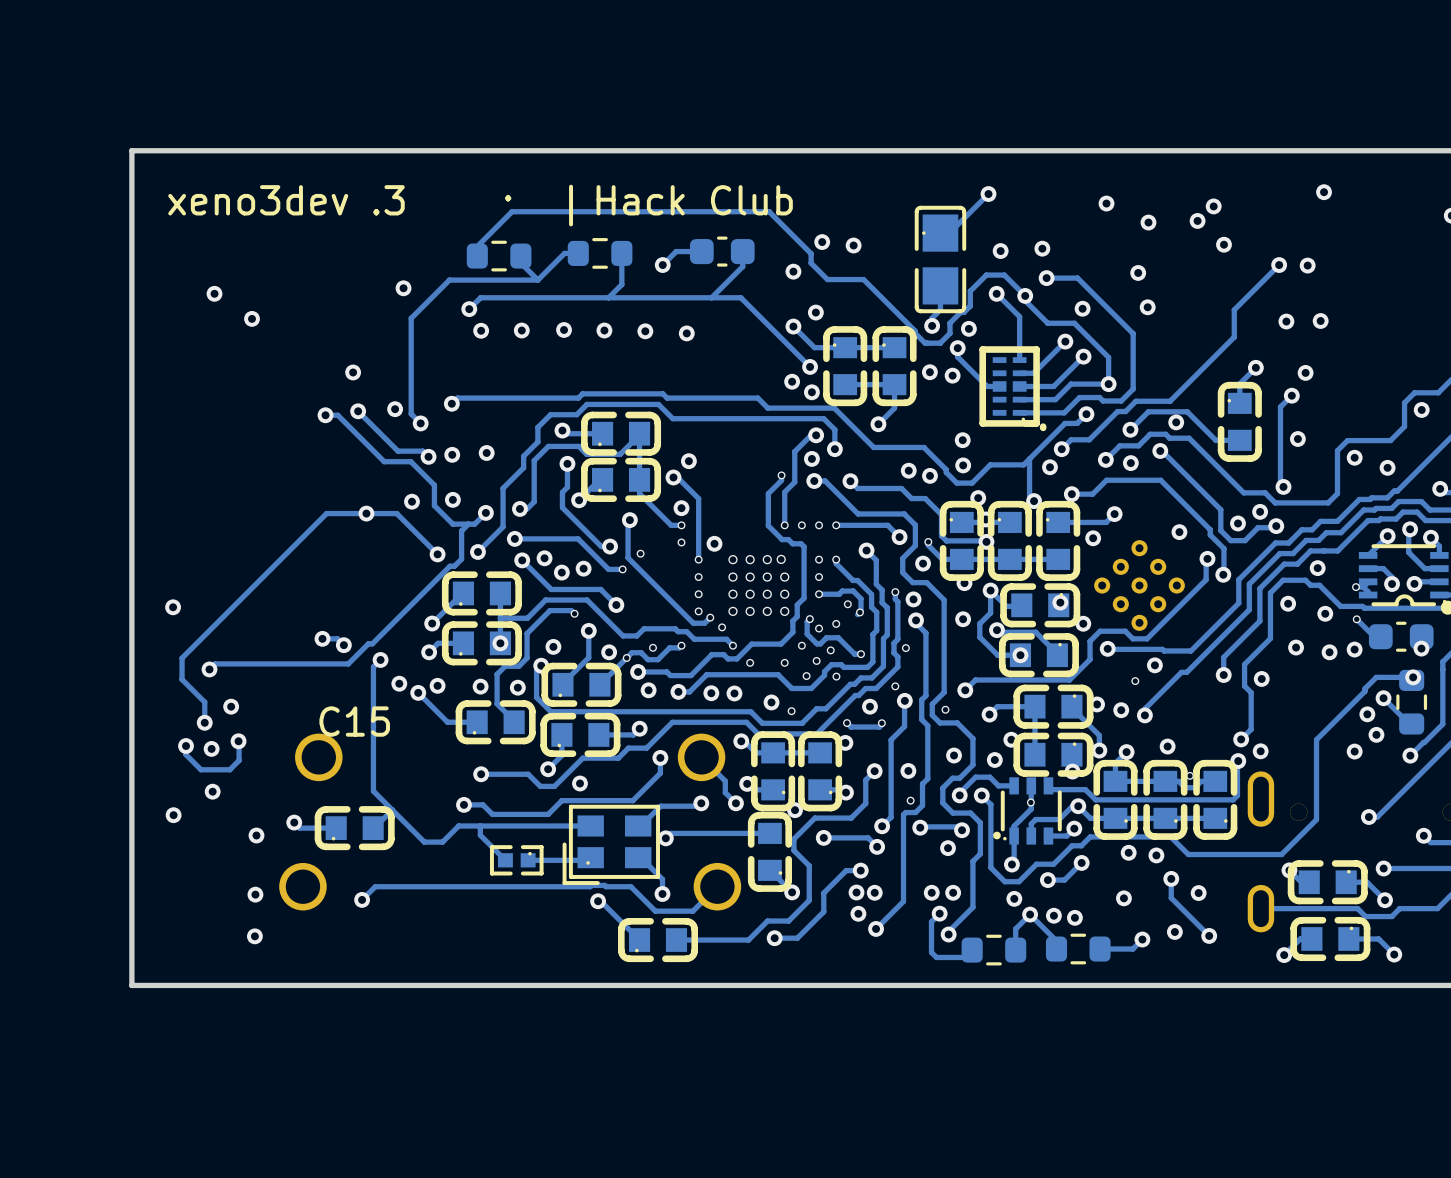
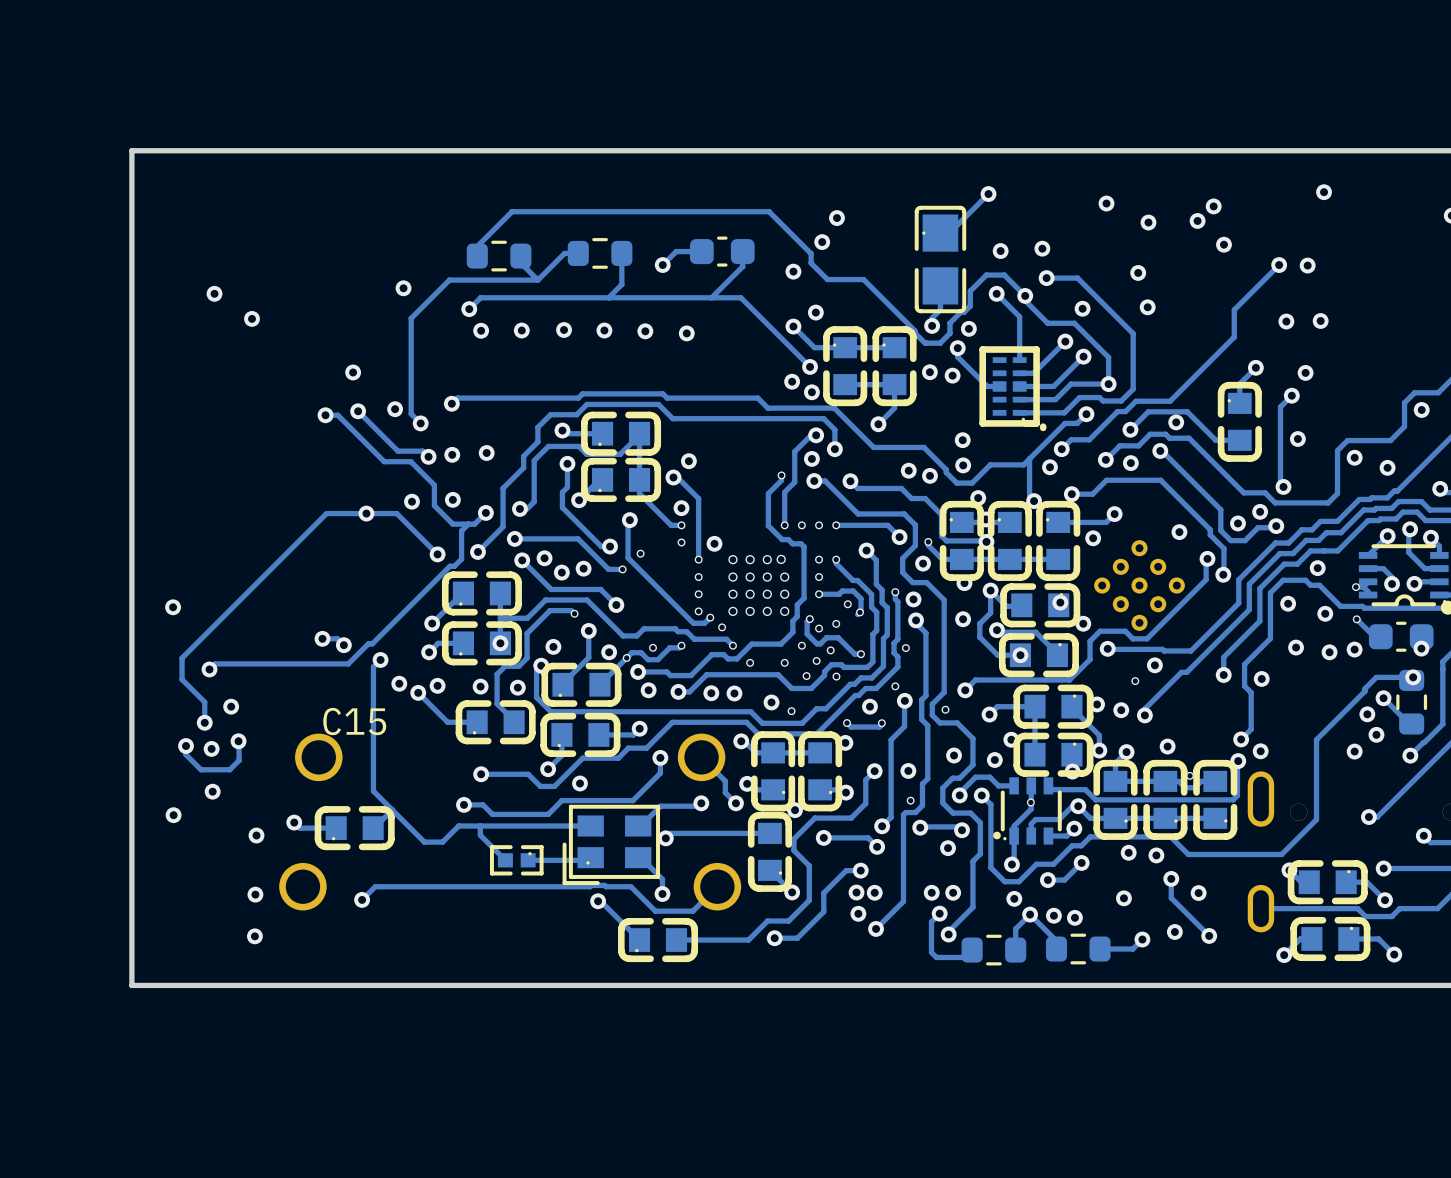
text: . (508, 198) -> none
text: xeno3dev .3 (286, 200) -> none
text: Hack Club (694, 200) -> none
text: | (571, 205) -> none
via position: (853, 245) -> (836, 218)

